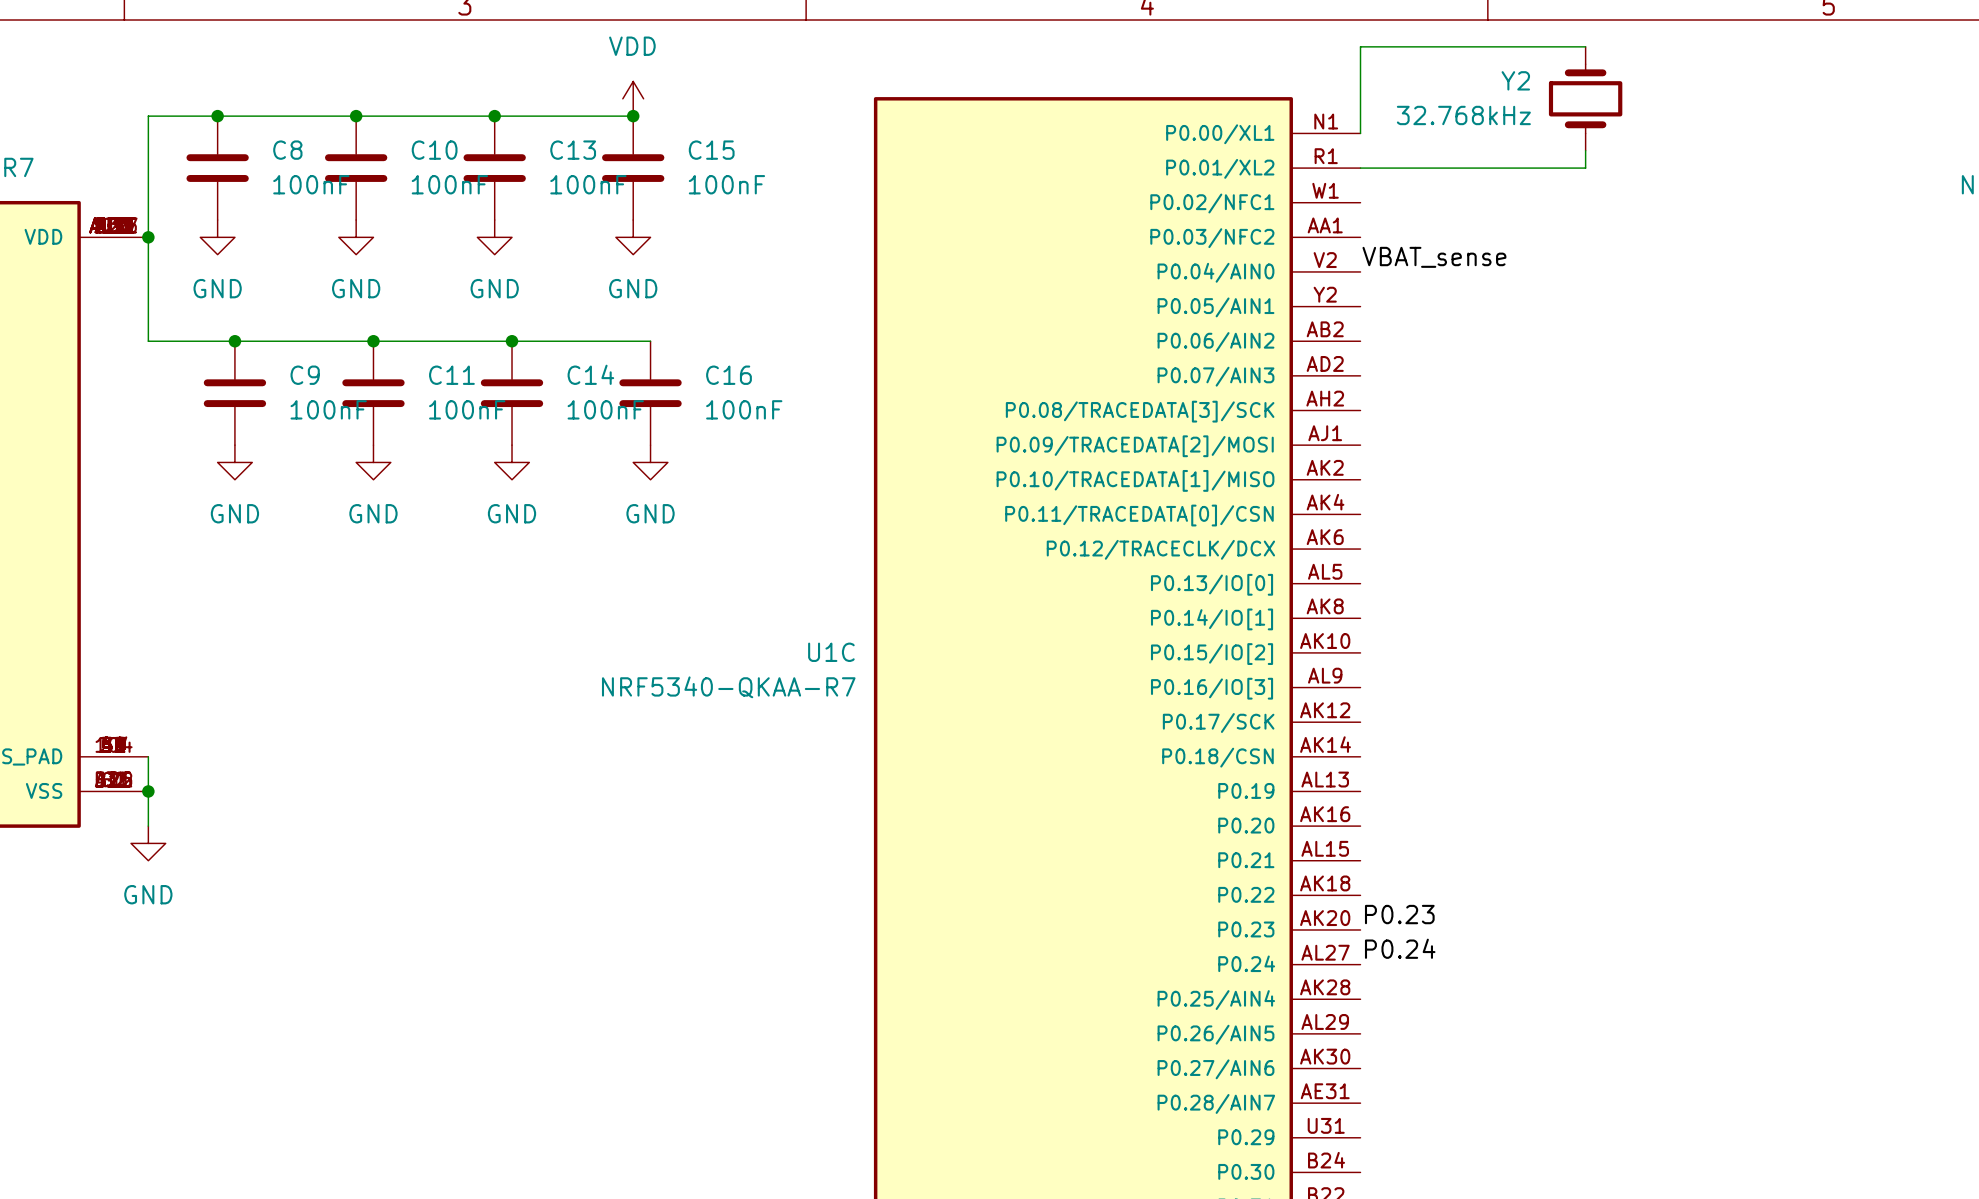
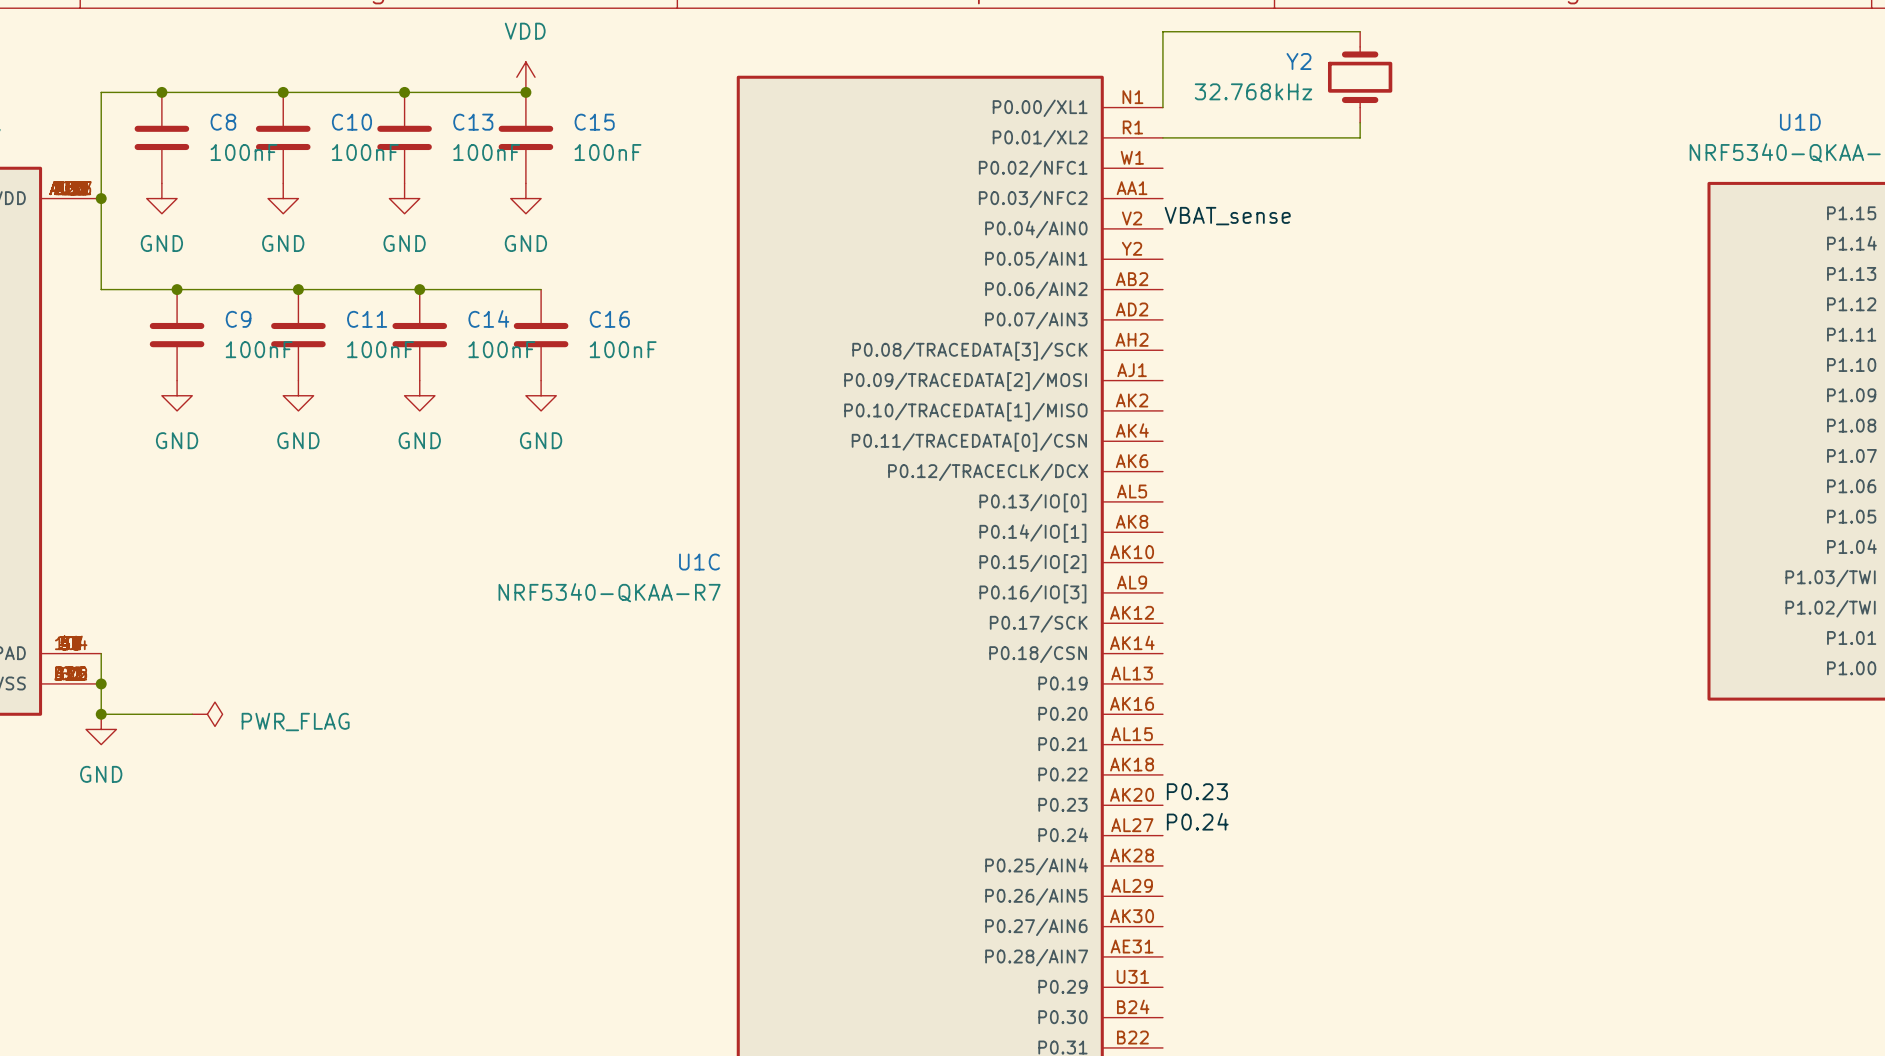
wire: none -> (101, 714) (192, 714)
junction: none -> (101, 714)
power symbol: none -> PWR_FLAG (207, 714)

